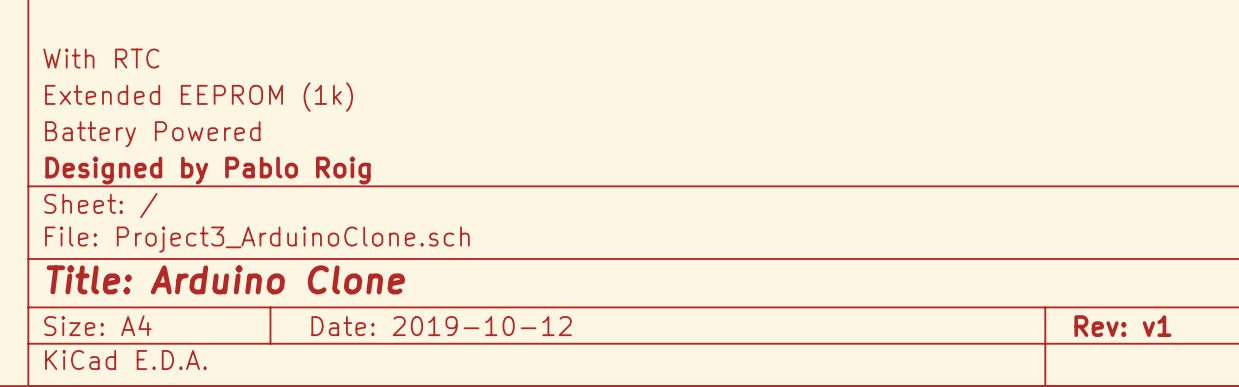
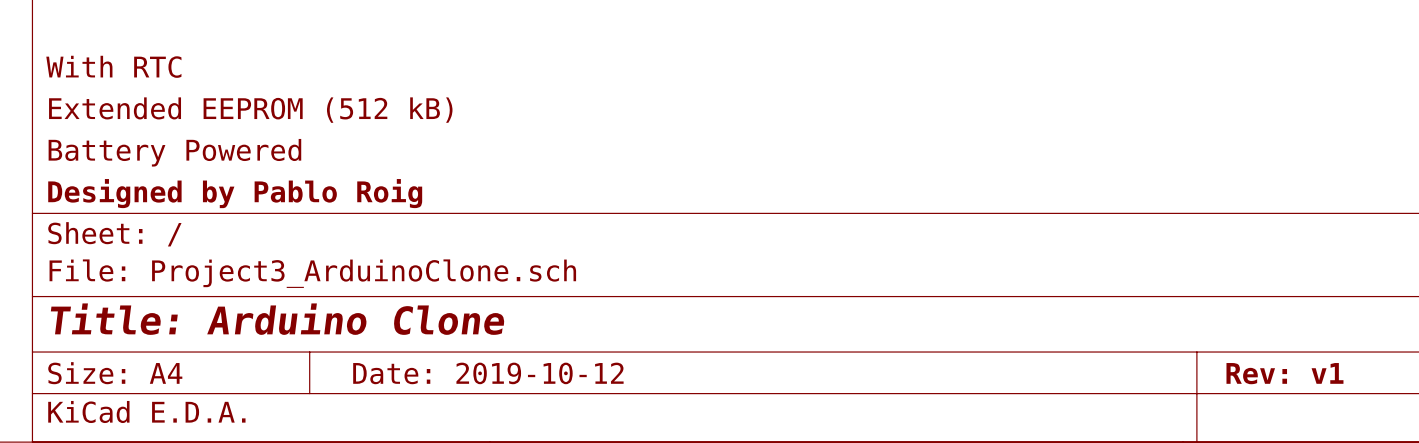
title block: Extended EEPROM (1k) (199, 97) -> Extended EEPROM (512 kB) (250, 110)

